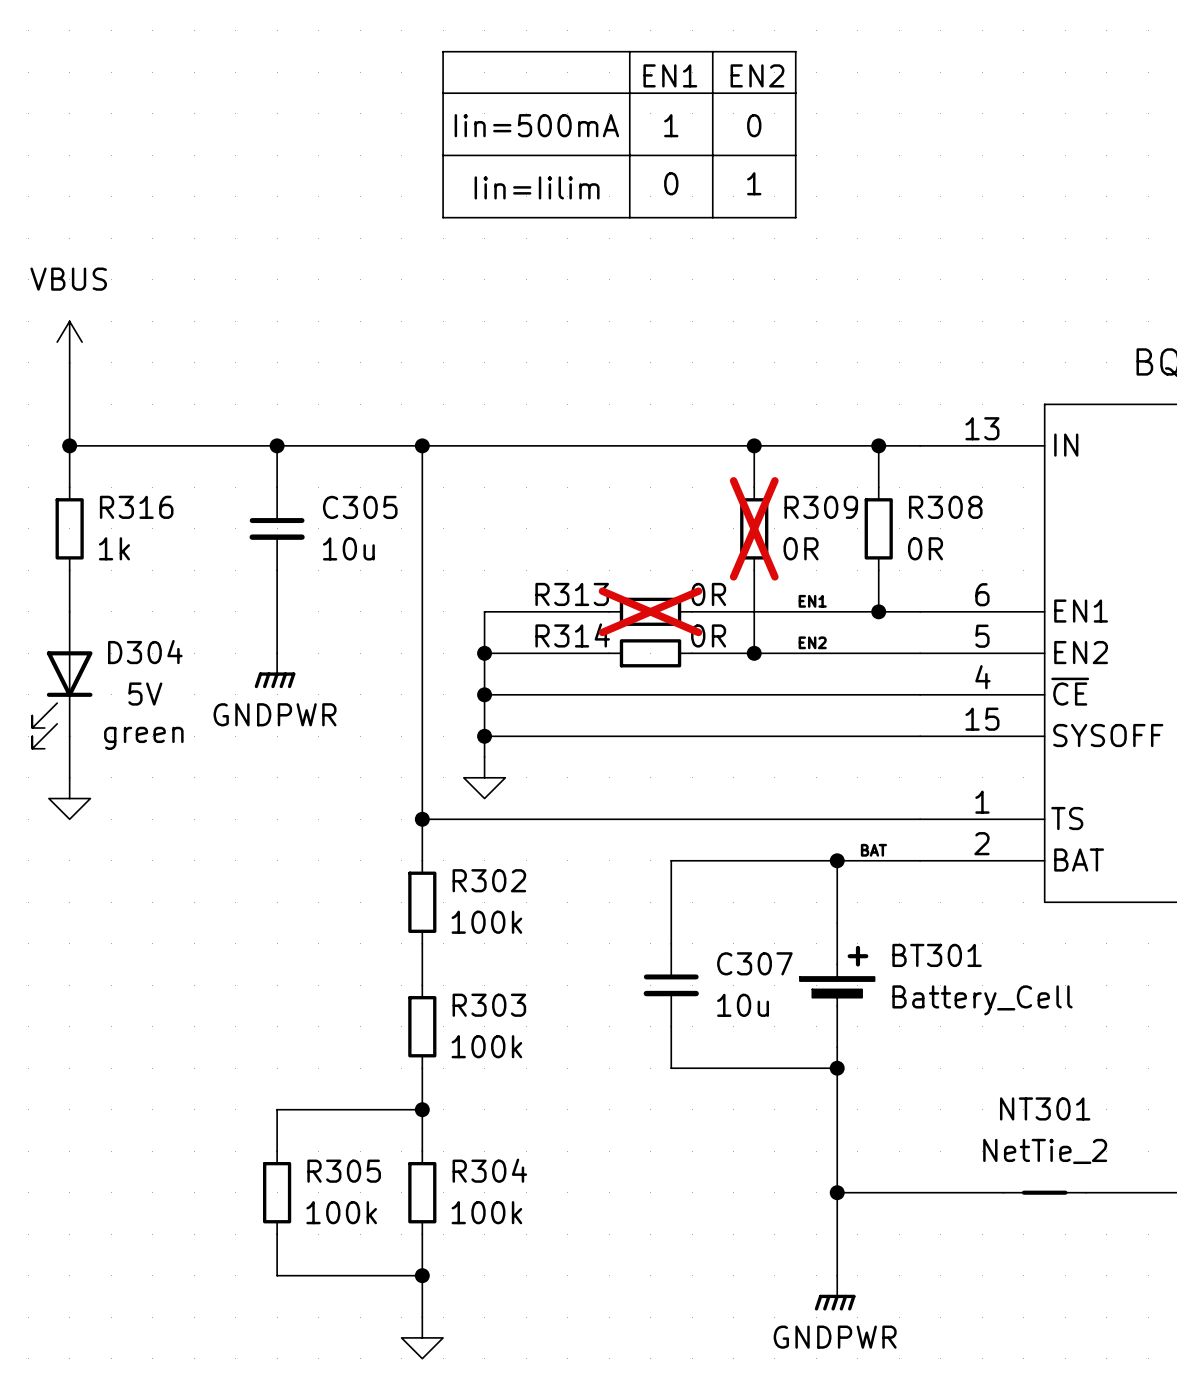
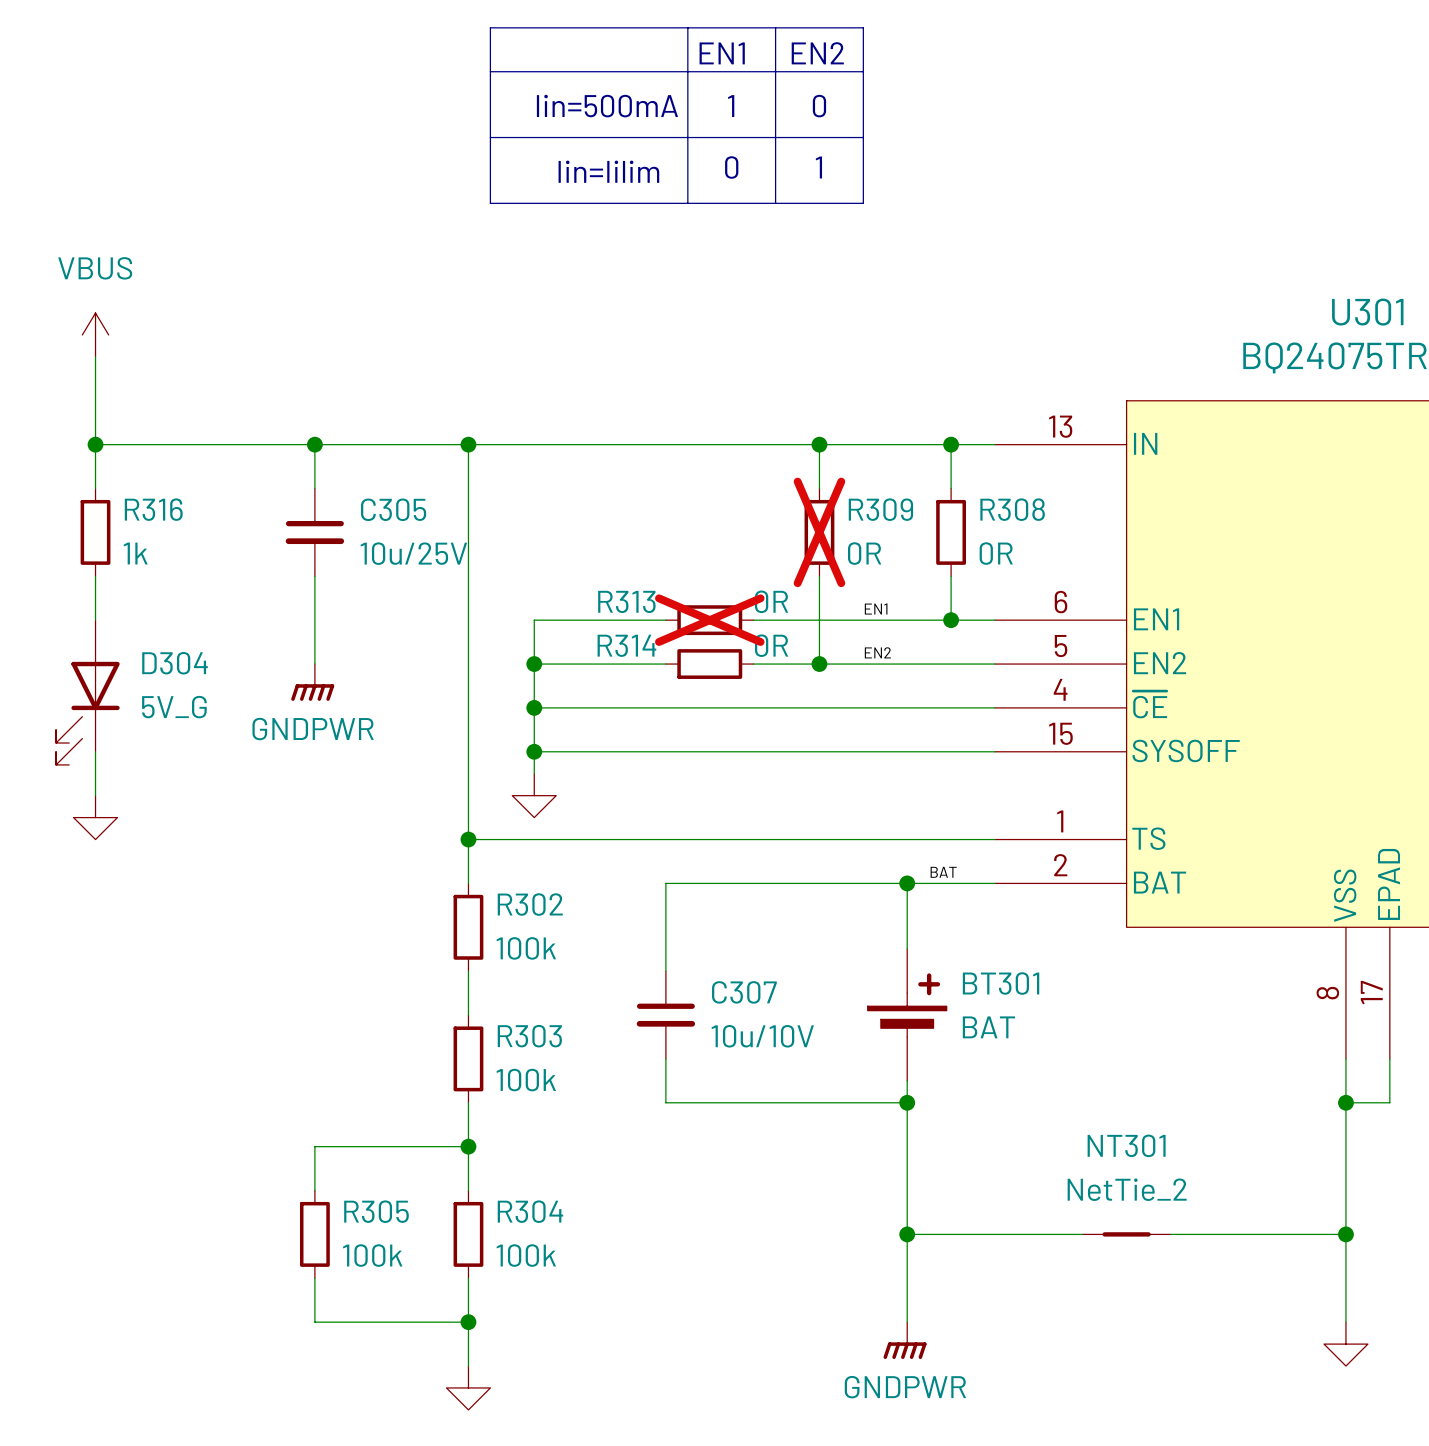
C305 value: 10u (348, 548) -> 10u/25V (413, 553)
D304 value: 5V (145, 694) -> 5V_G (174, 707)
text: green (143, 738) -> none
wire: (671, 860) (671, 943) -> (731, 883) (665, 883) (665, 971)
C307 position: (671, 985) -> (665, 1015)
BT301 value: Battery_Cell (982, 1000) -> BAT (988, 1027)
C307 value: 10u (743, 1005) -> 10u/10V (762, 1036)
wire: (671, 1026) (671, 1068) -> (665, 1058) (665, 1102) (731, 1102)

